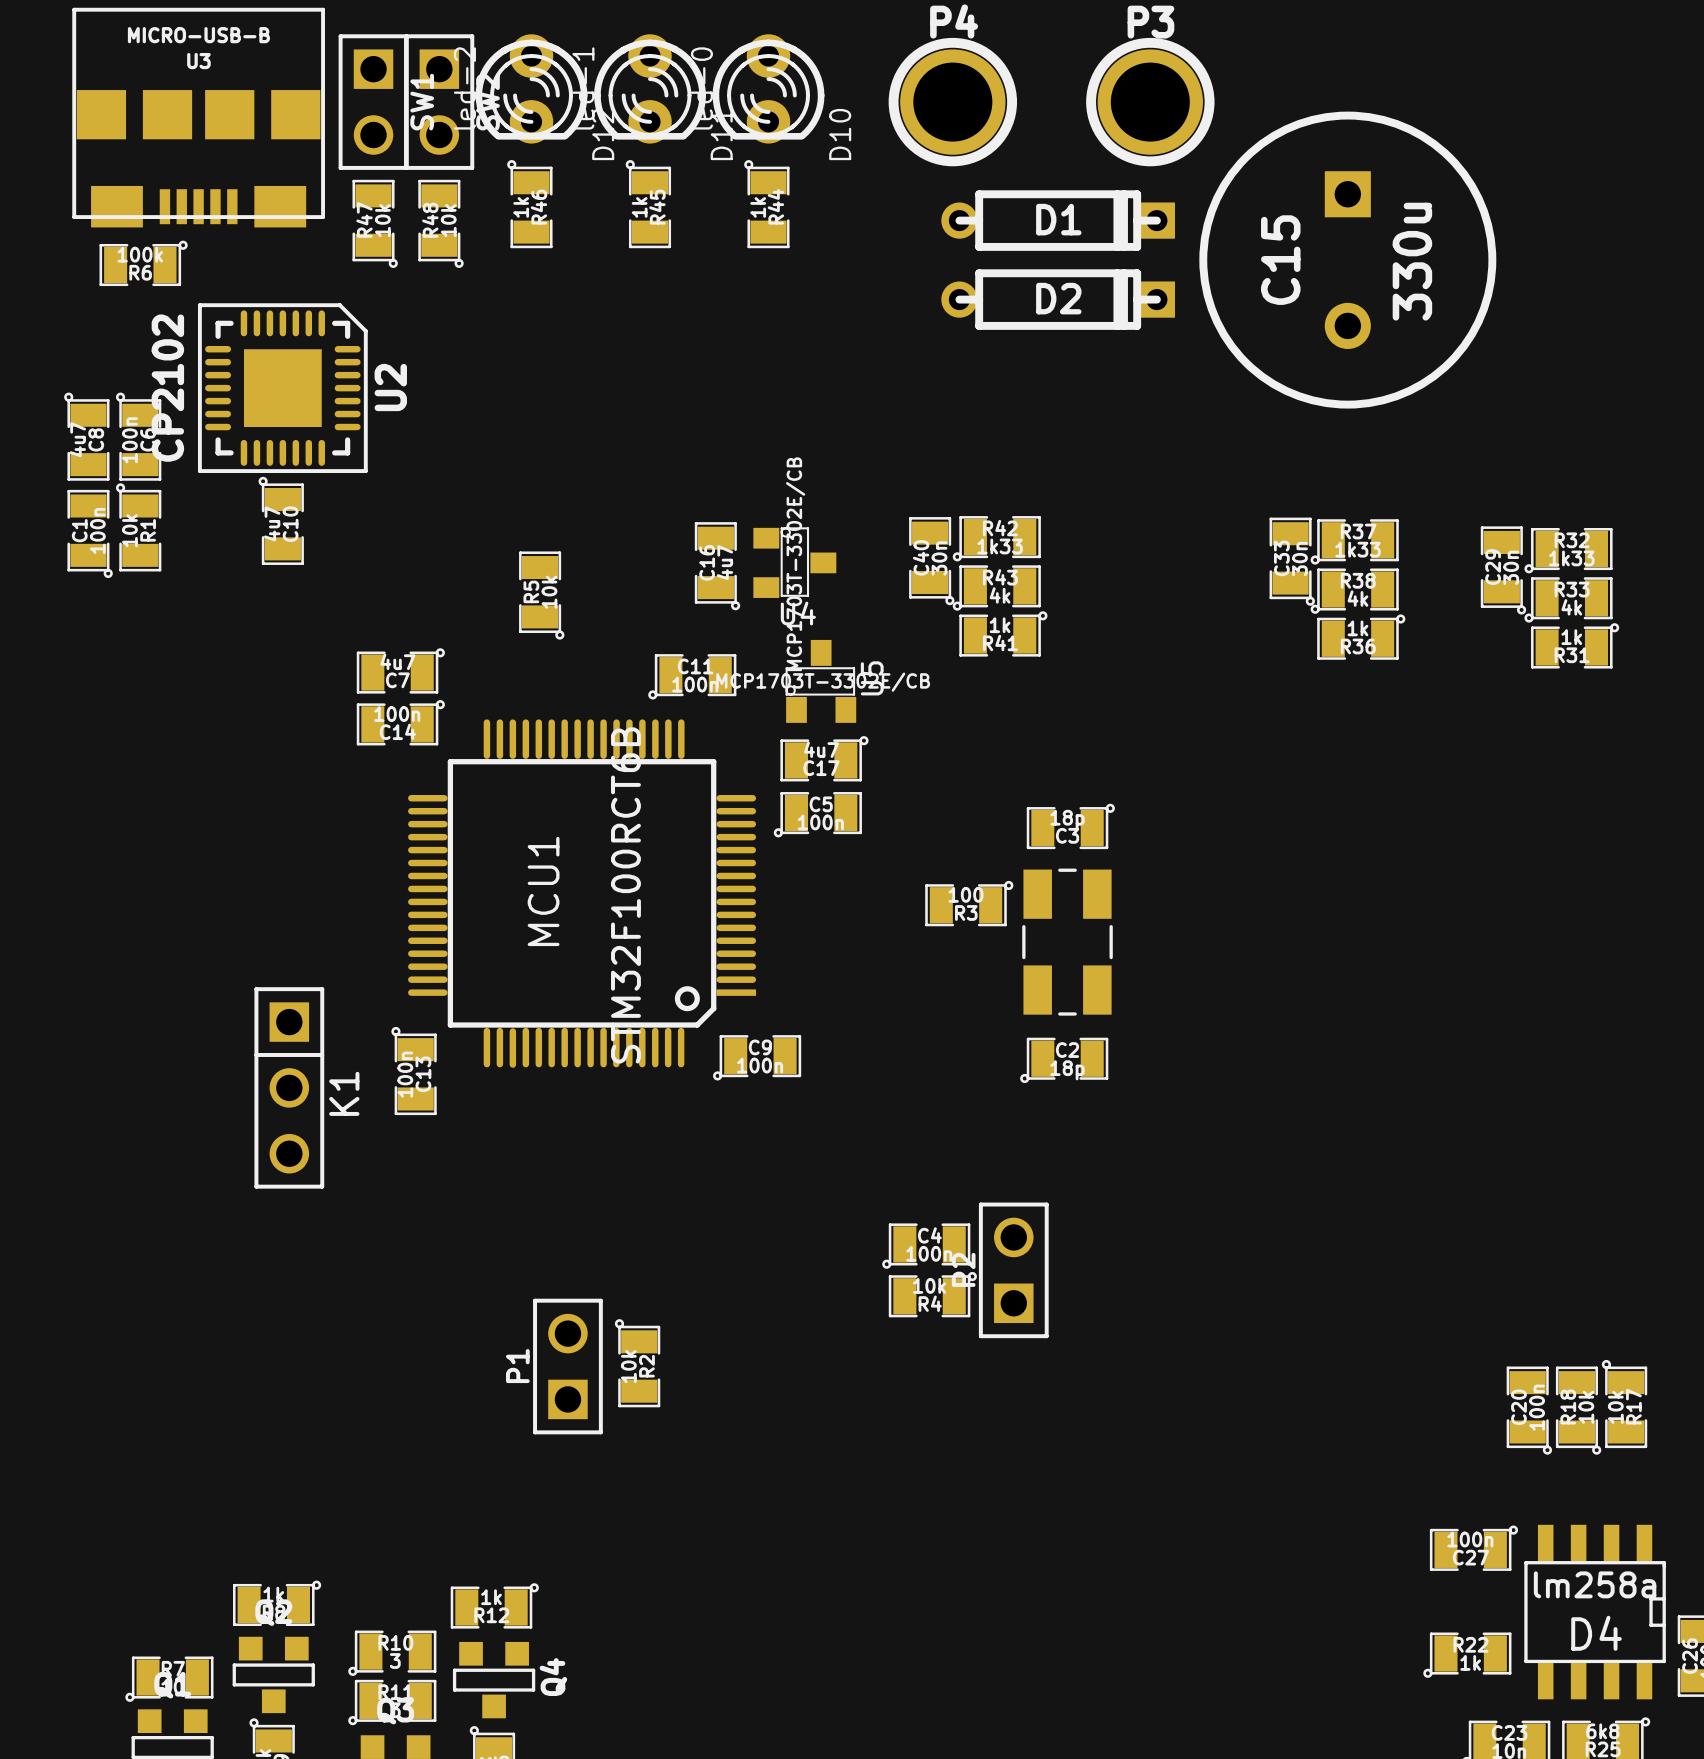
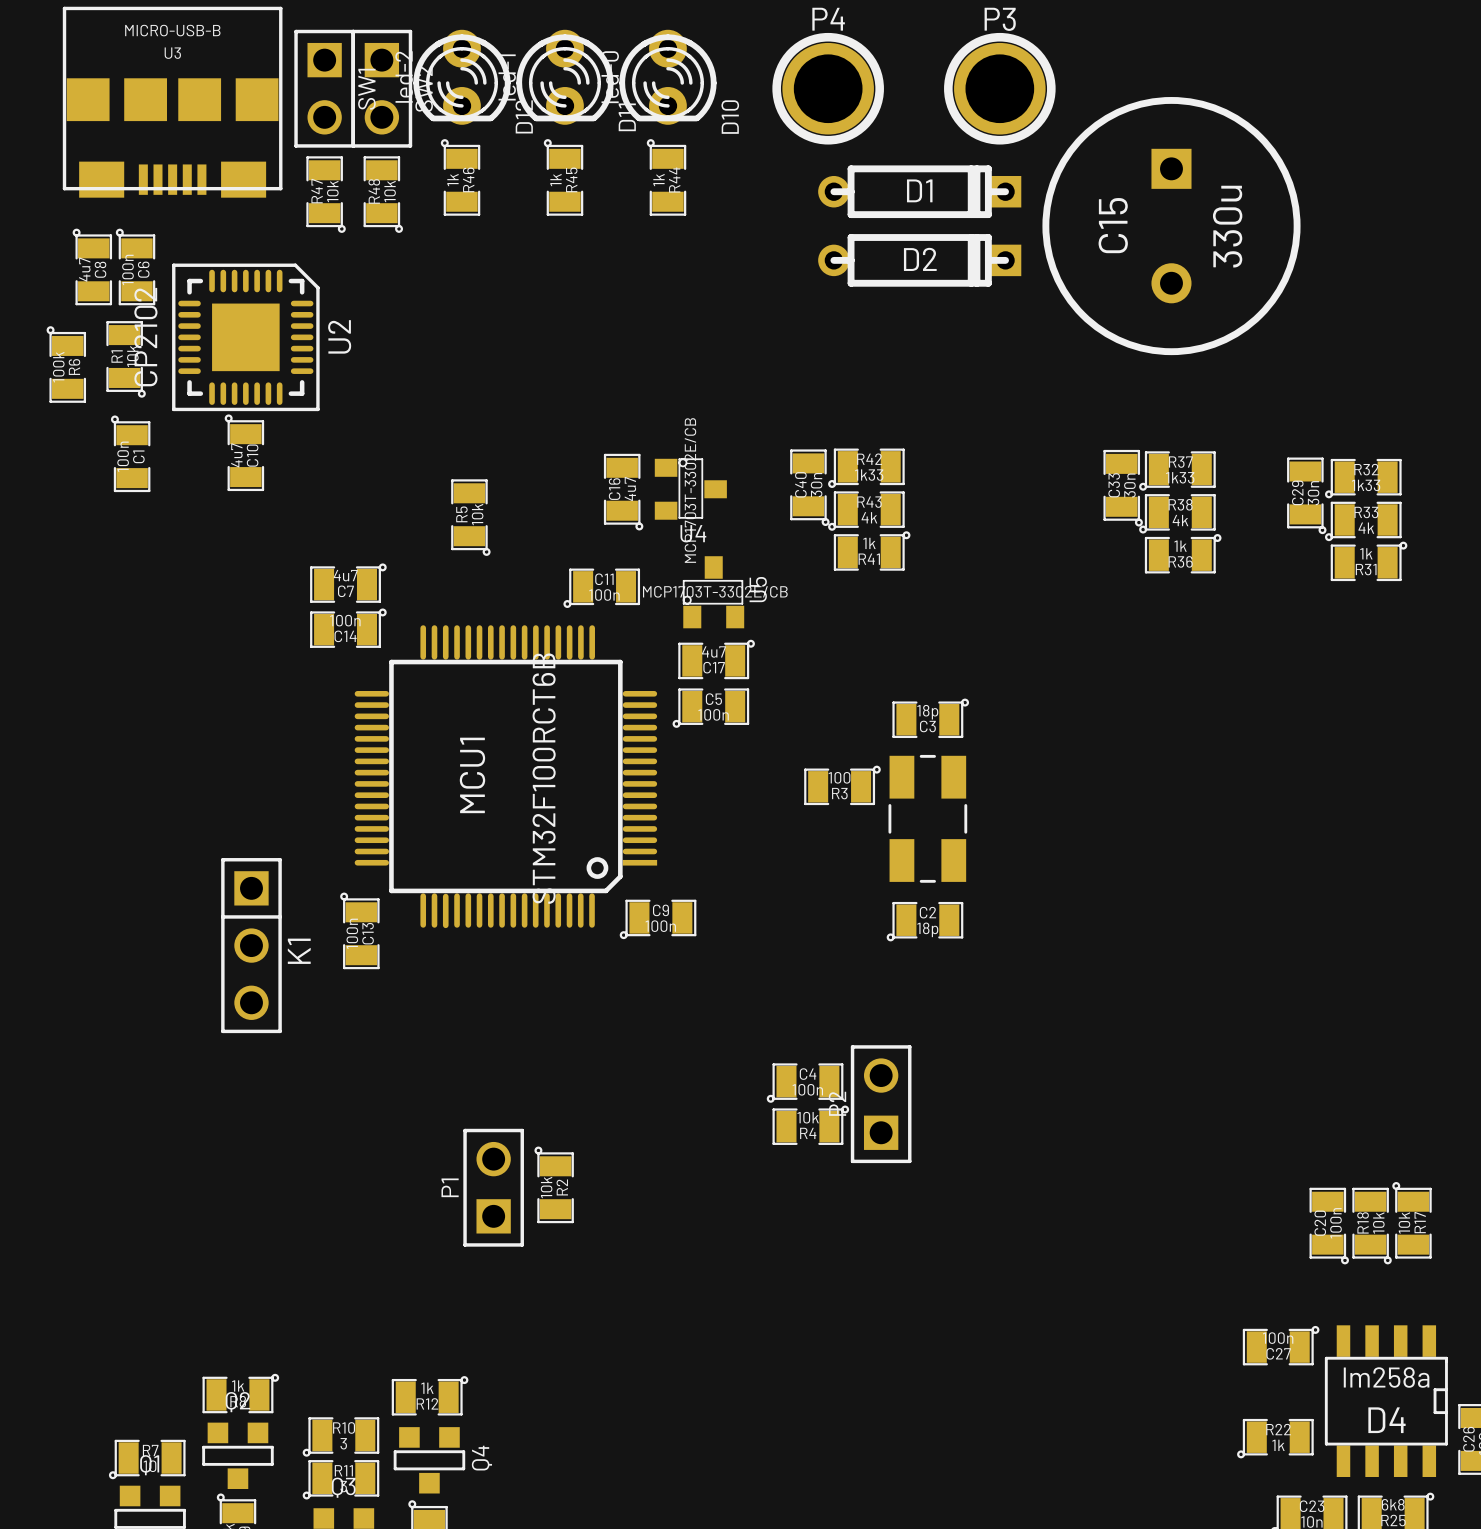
R6 rotation: 0° (143, 263) -> 90° counterclockwise (66, 364)
R6 position: (143, 263) -> (66, 364)
C8 position: (86, 436) -> (92, 266)
C6 position: (138, 436) -> (135, 266)
R1 rotation: 0° (138, 527) -> 180° (126, 359)
R1 position: (138, 527) -> (126, 359)
C1 rotation: 0° (90, 533) -> 180° (130, 453)
C1 position: (90, 533) -> (130, 453)

